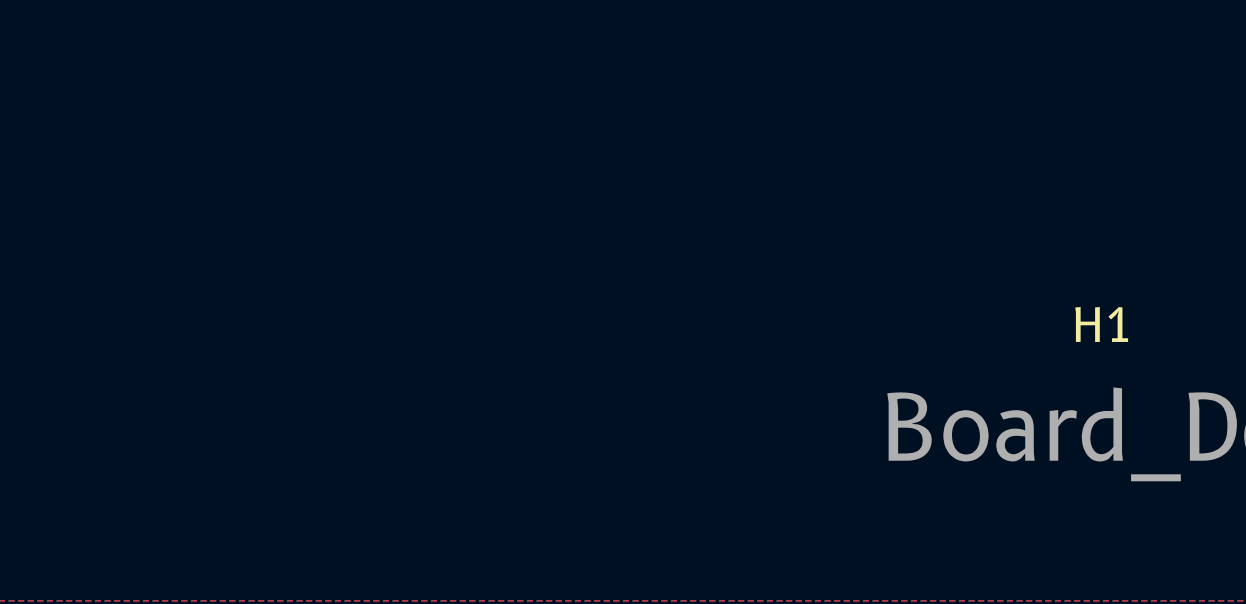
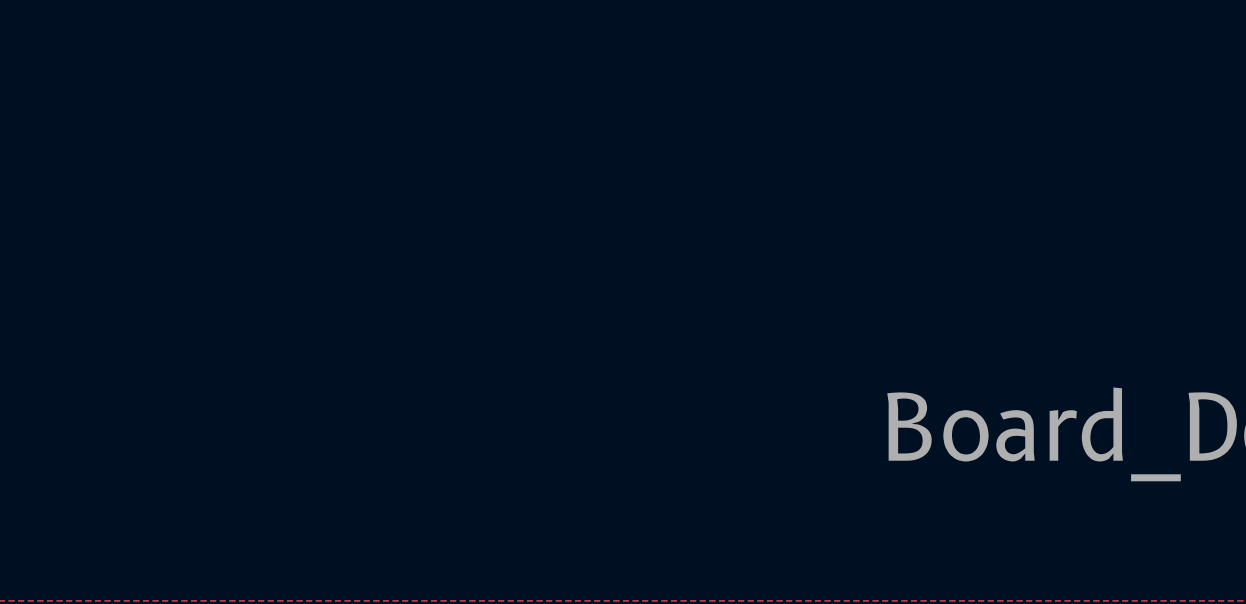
H1 name: H1 (1101, 324) -> none

